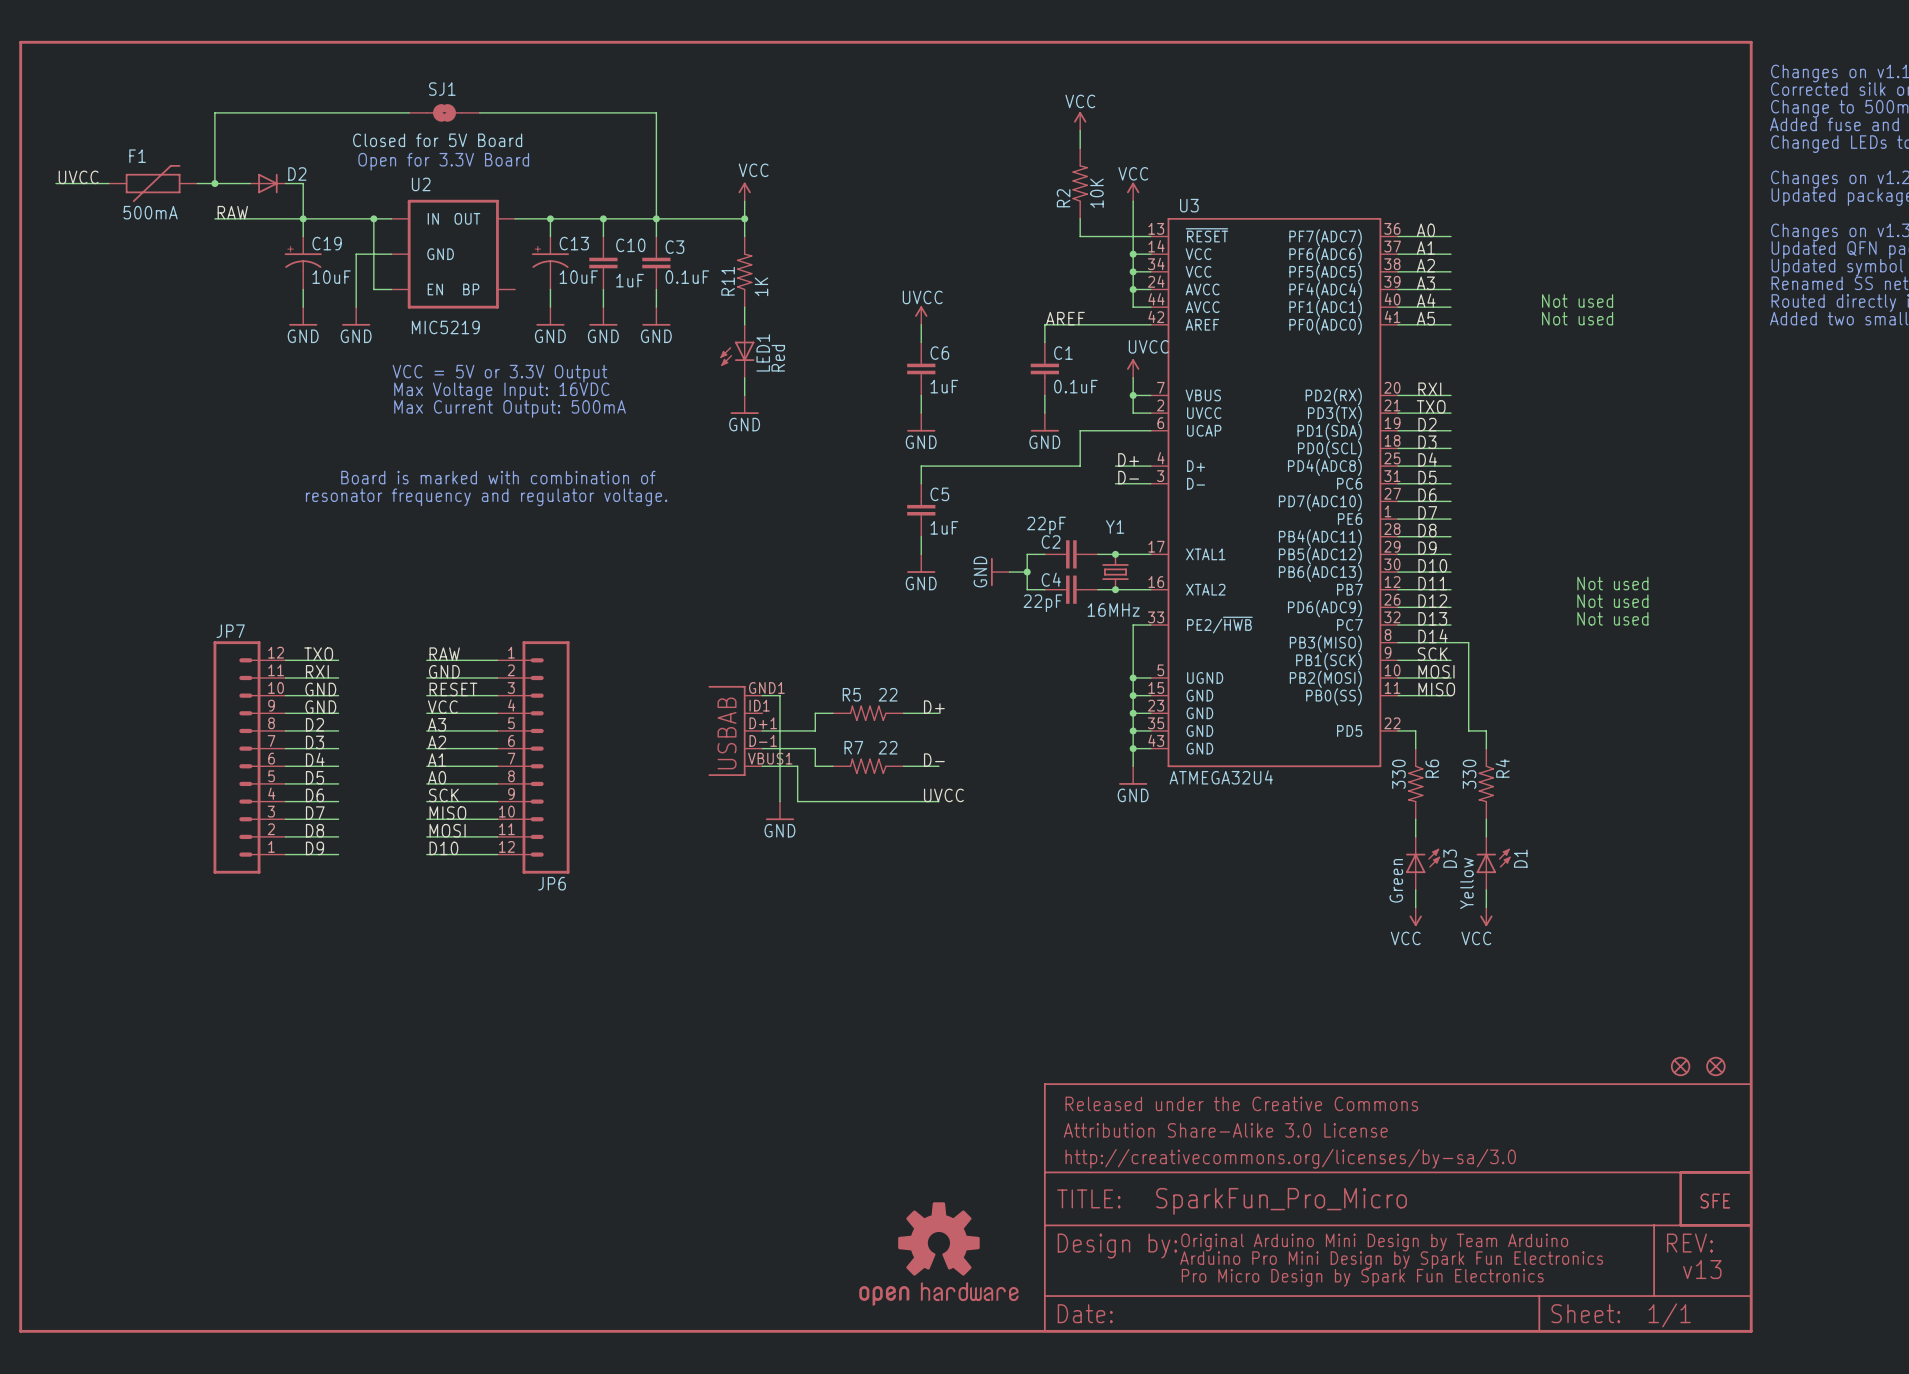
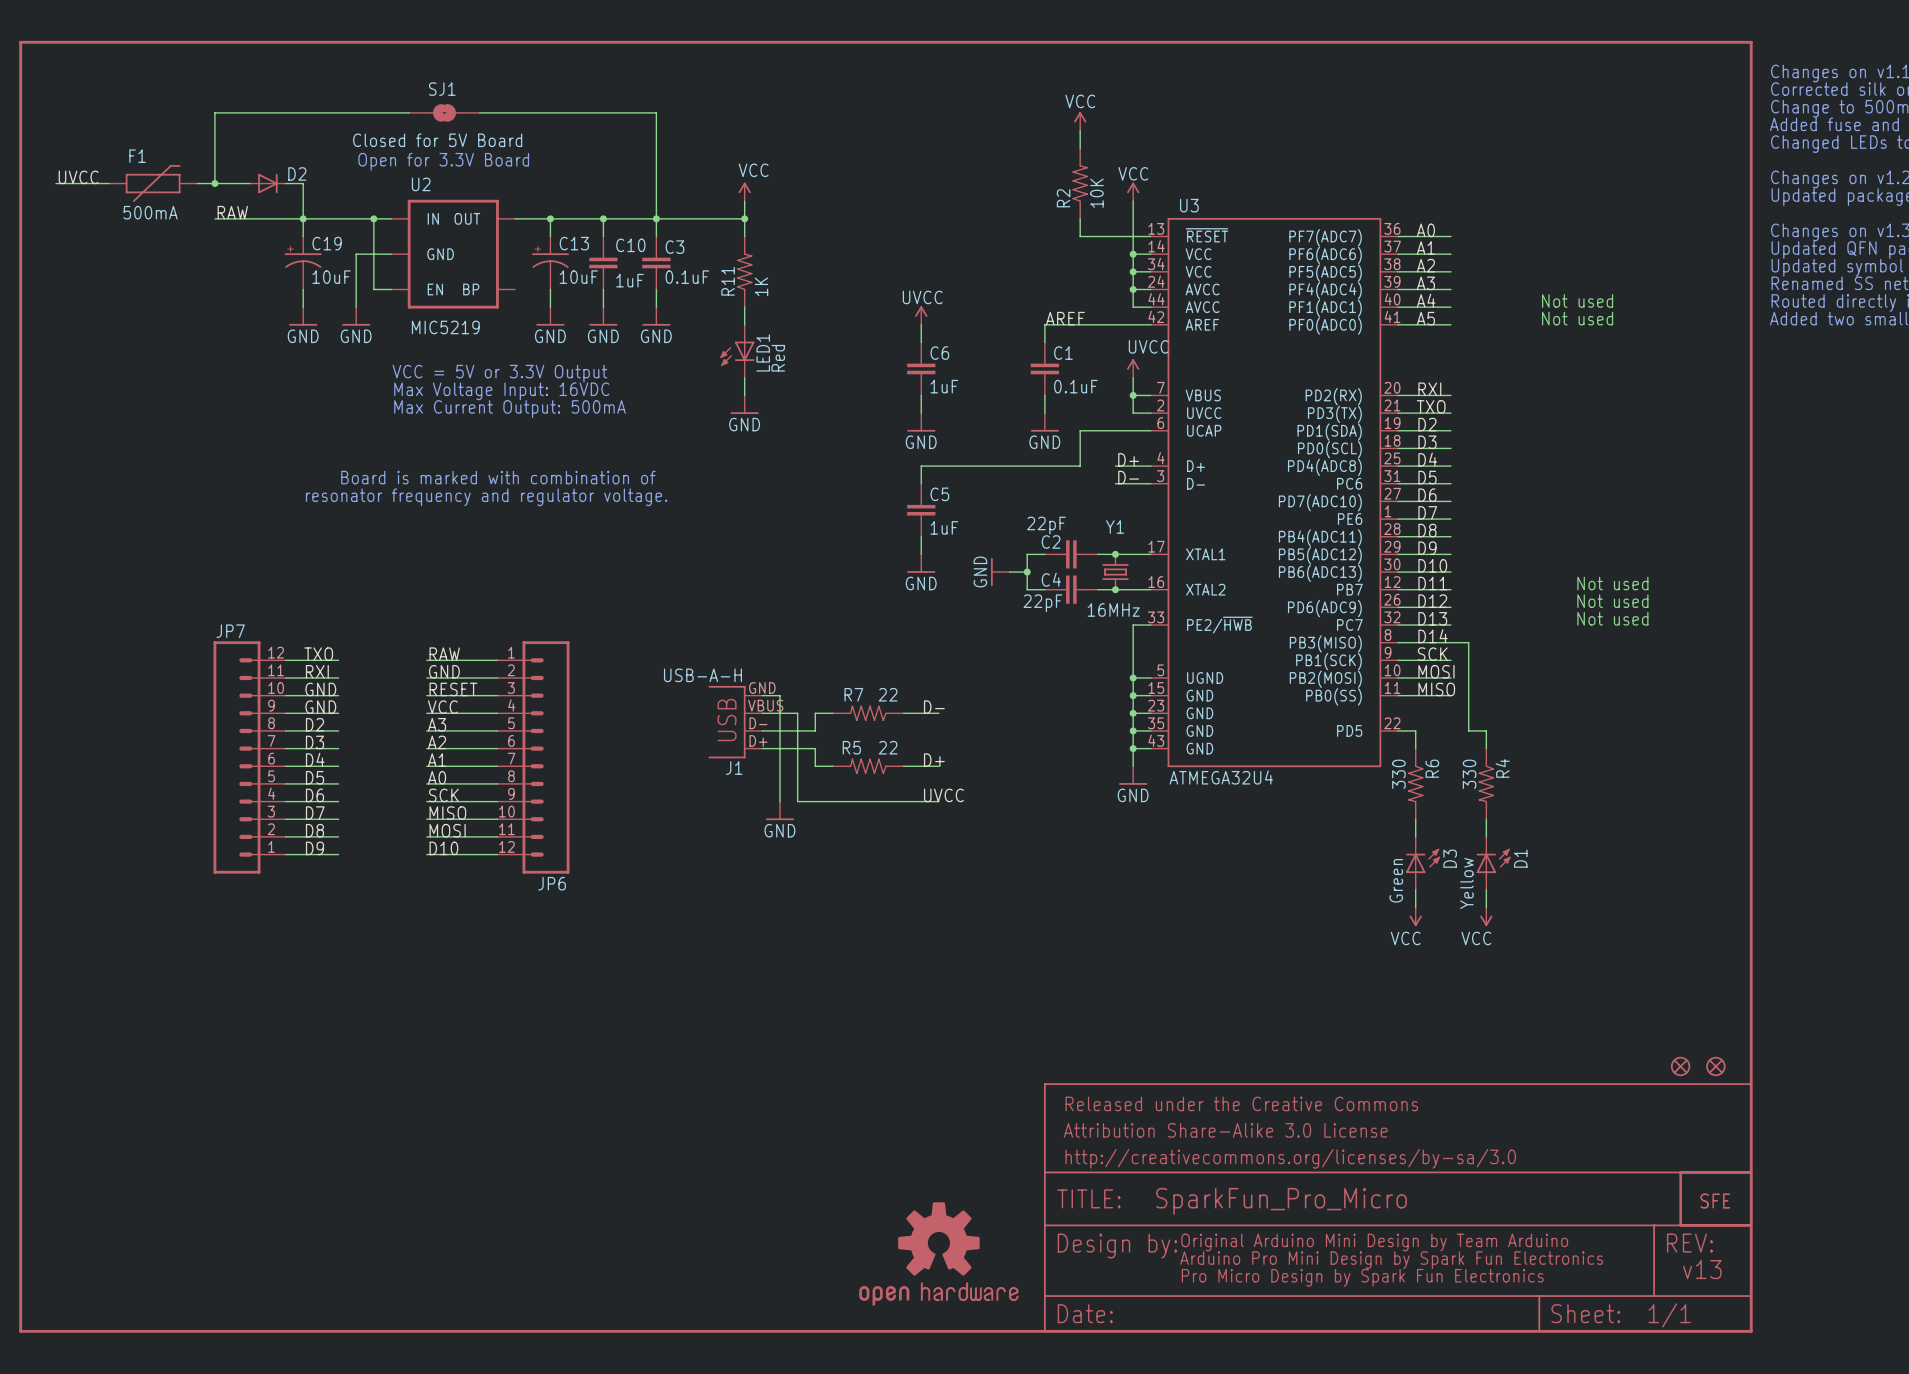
R5 name: R5 (851, 694) -> R7 (853, 694)
label: D+ (934, 707) -> D- (934, 707)
J1: none -> USB-A-H (735, 722)
part: (735, 730) -> none
R7 name: R7 (853, 747) -> R5 (851, 747)
label: D- (934, 760) -> D+ (934, 760)
wire: (762, 766) (797, 766) -> (762, 713) (797, 713) (797, 766)

